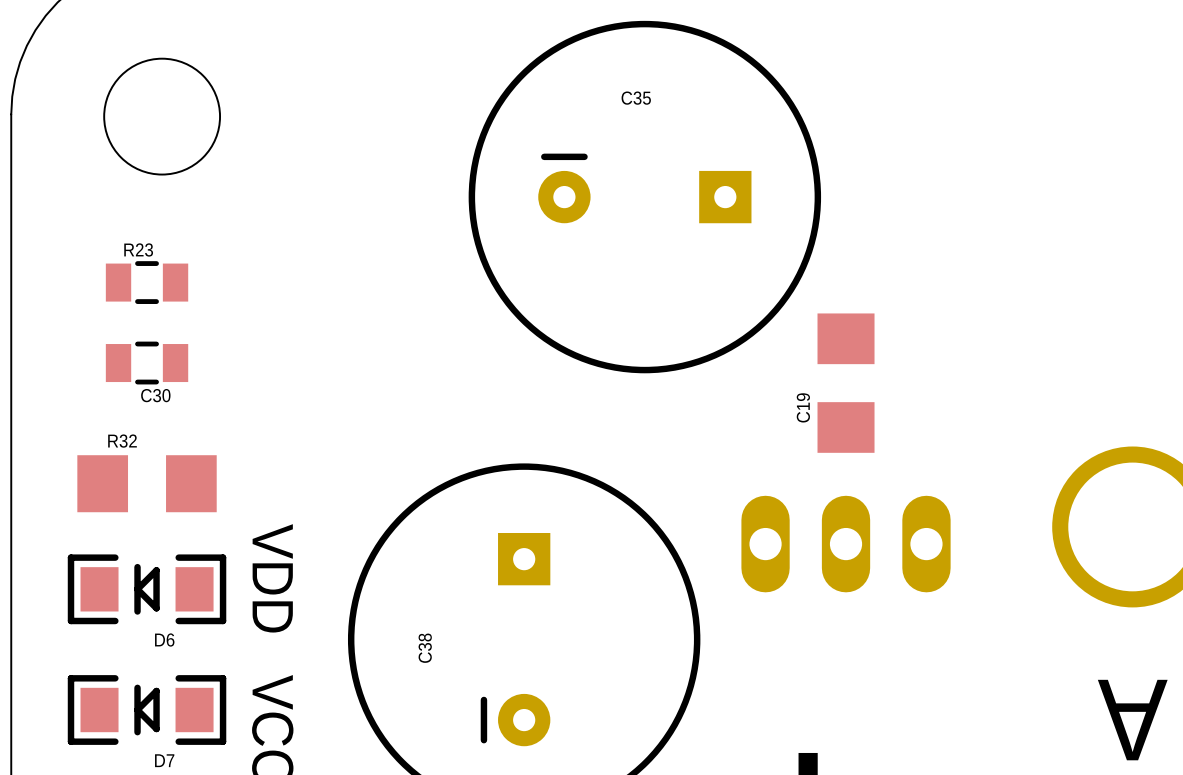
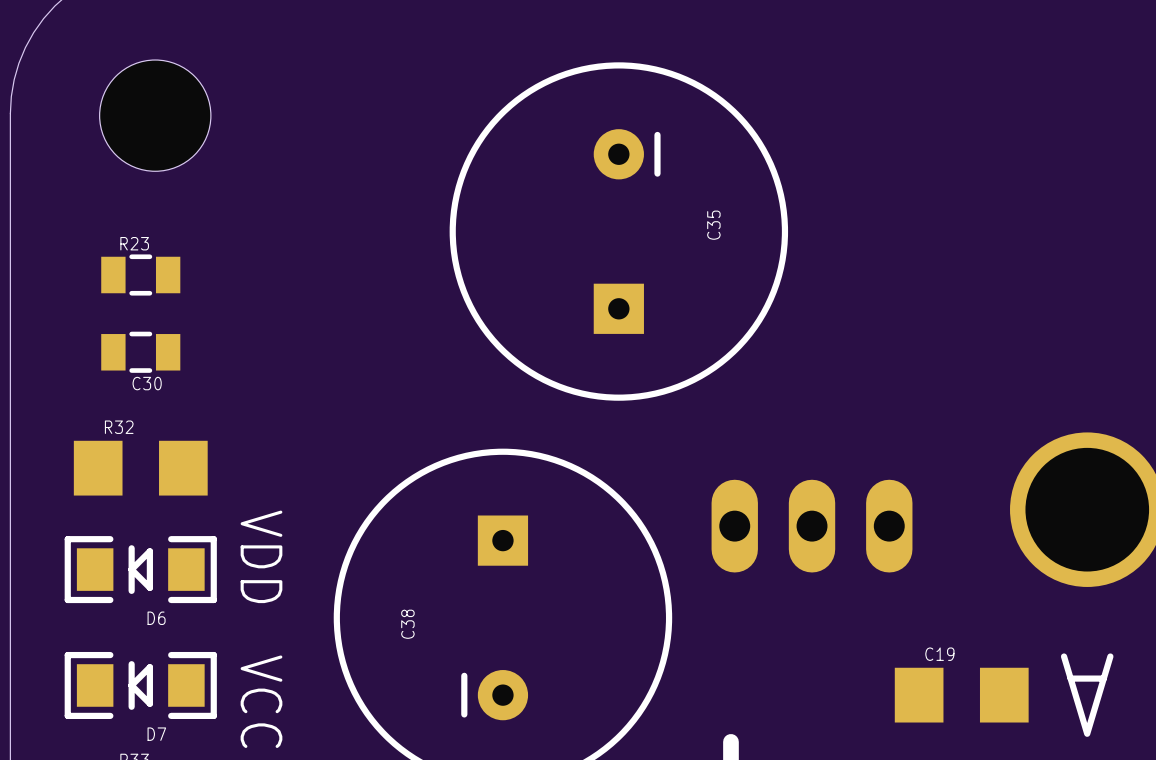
C35 rotation: 0° (644, 197) -> 90° clockwise (618, 231)
C19 rotation: 0° (846, 383) -> 90° clockwise (961, 695)
C19 position: (846, 383) -> (961, 695)

